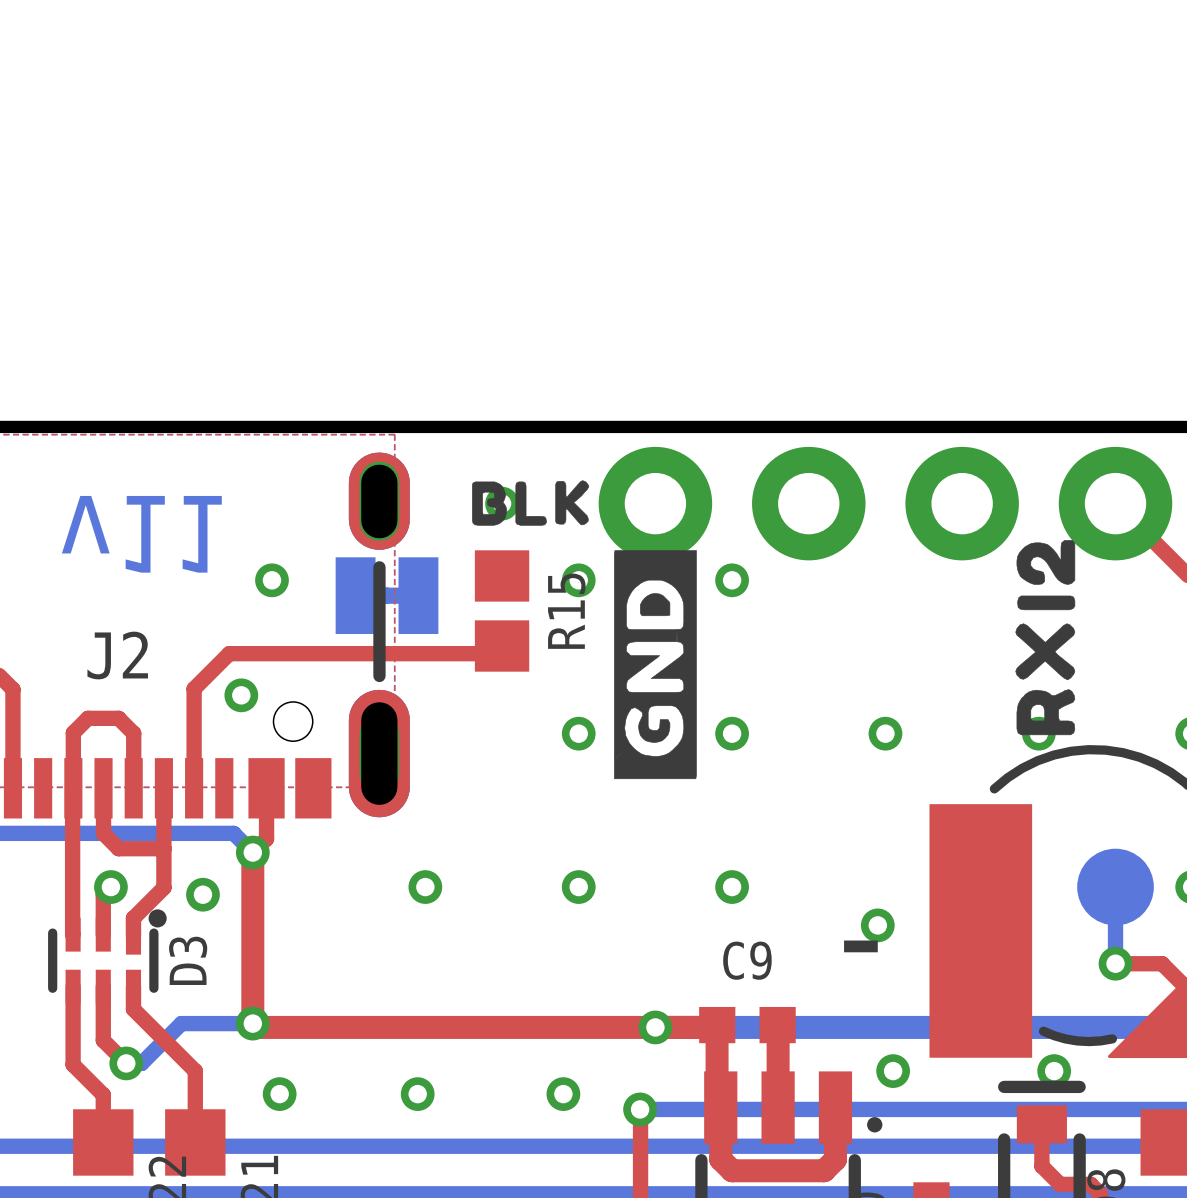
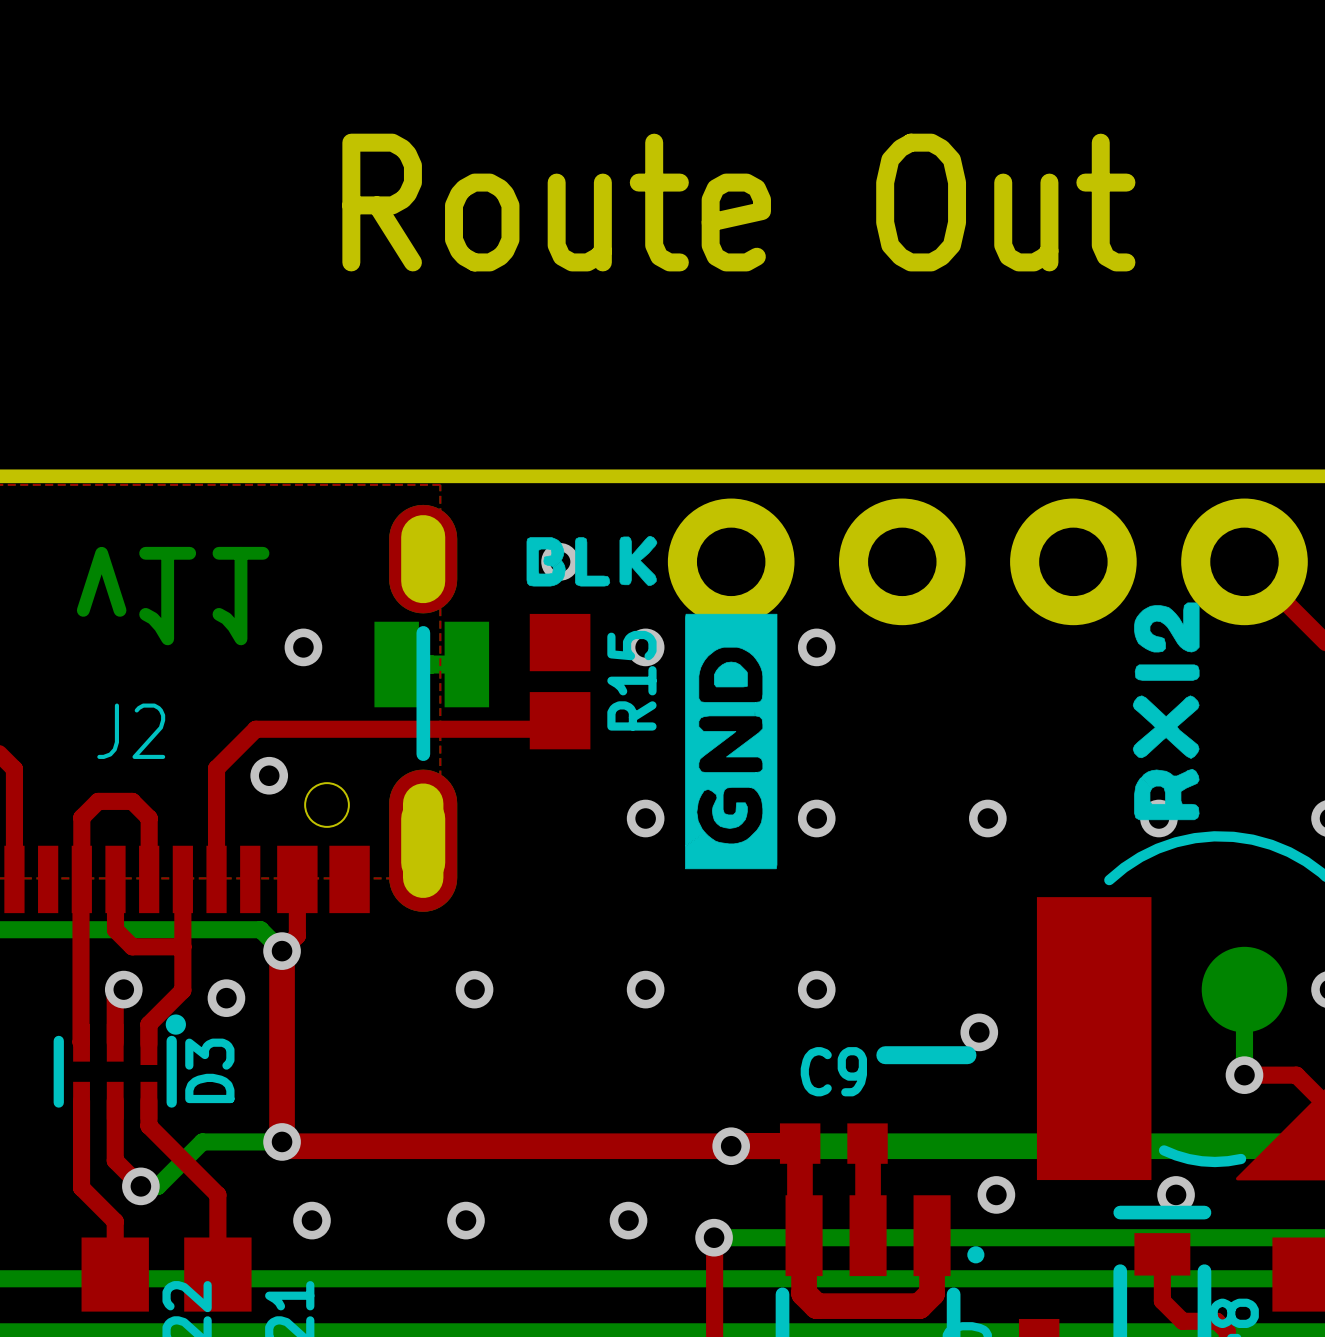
text: none -> Route Out (738, 202)

